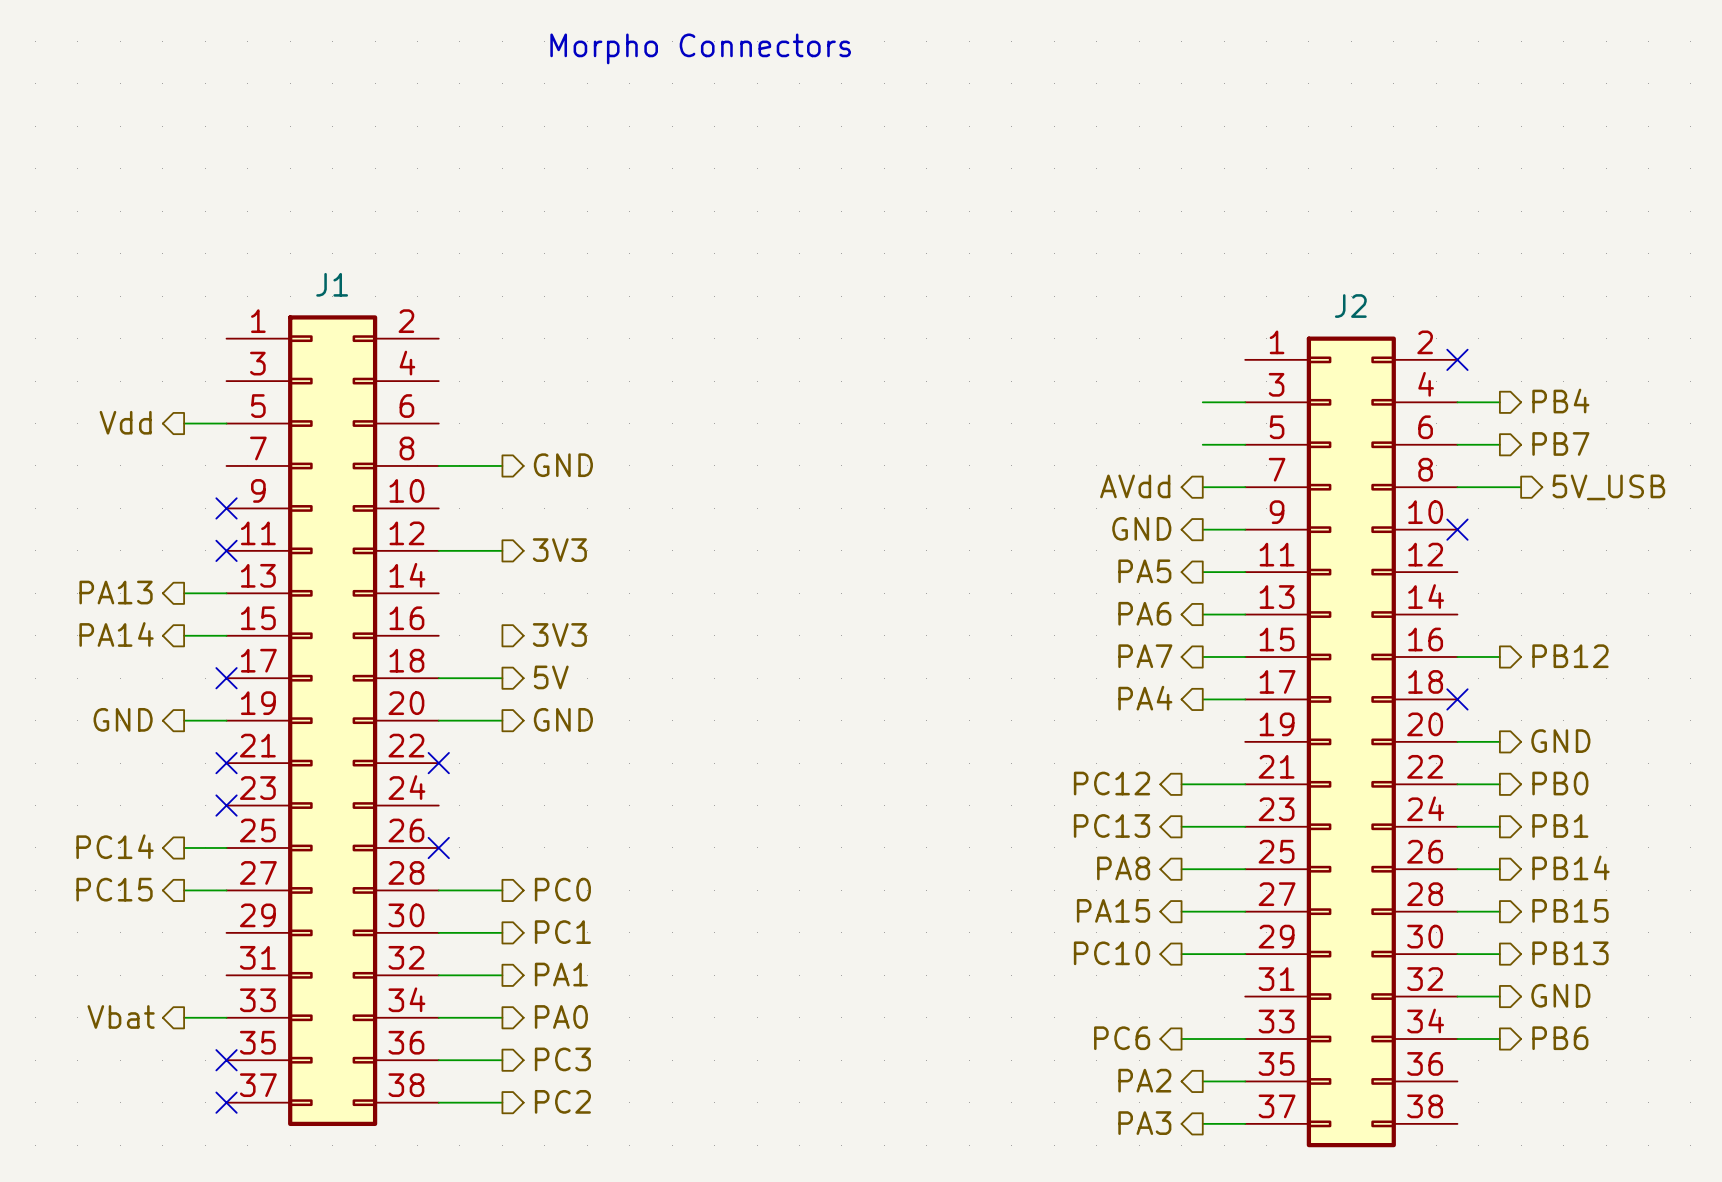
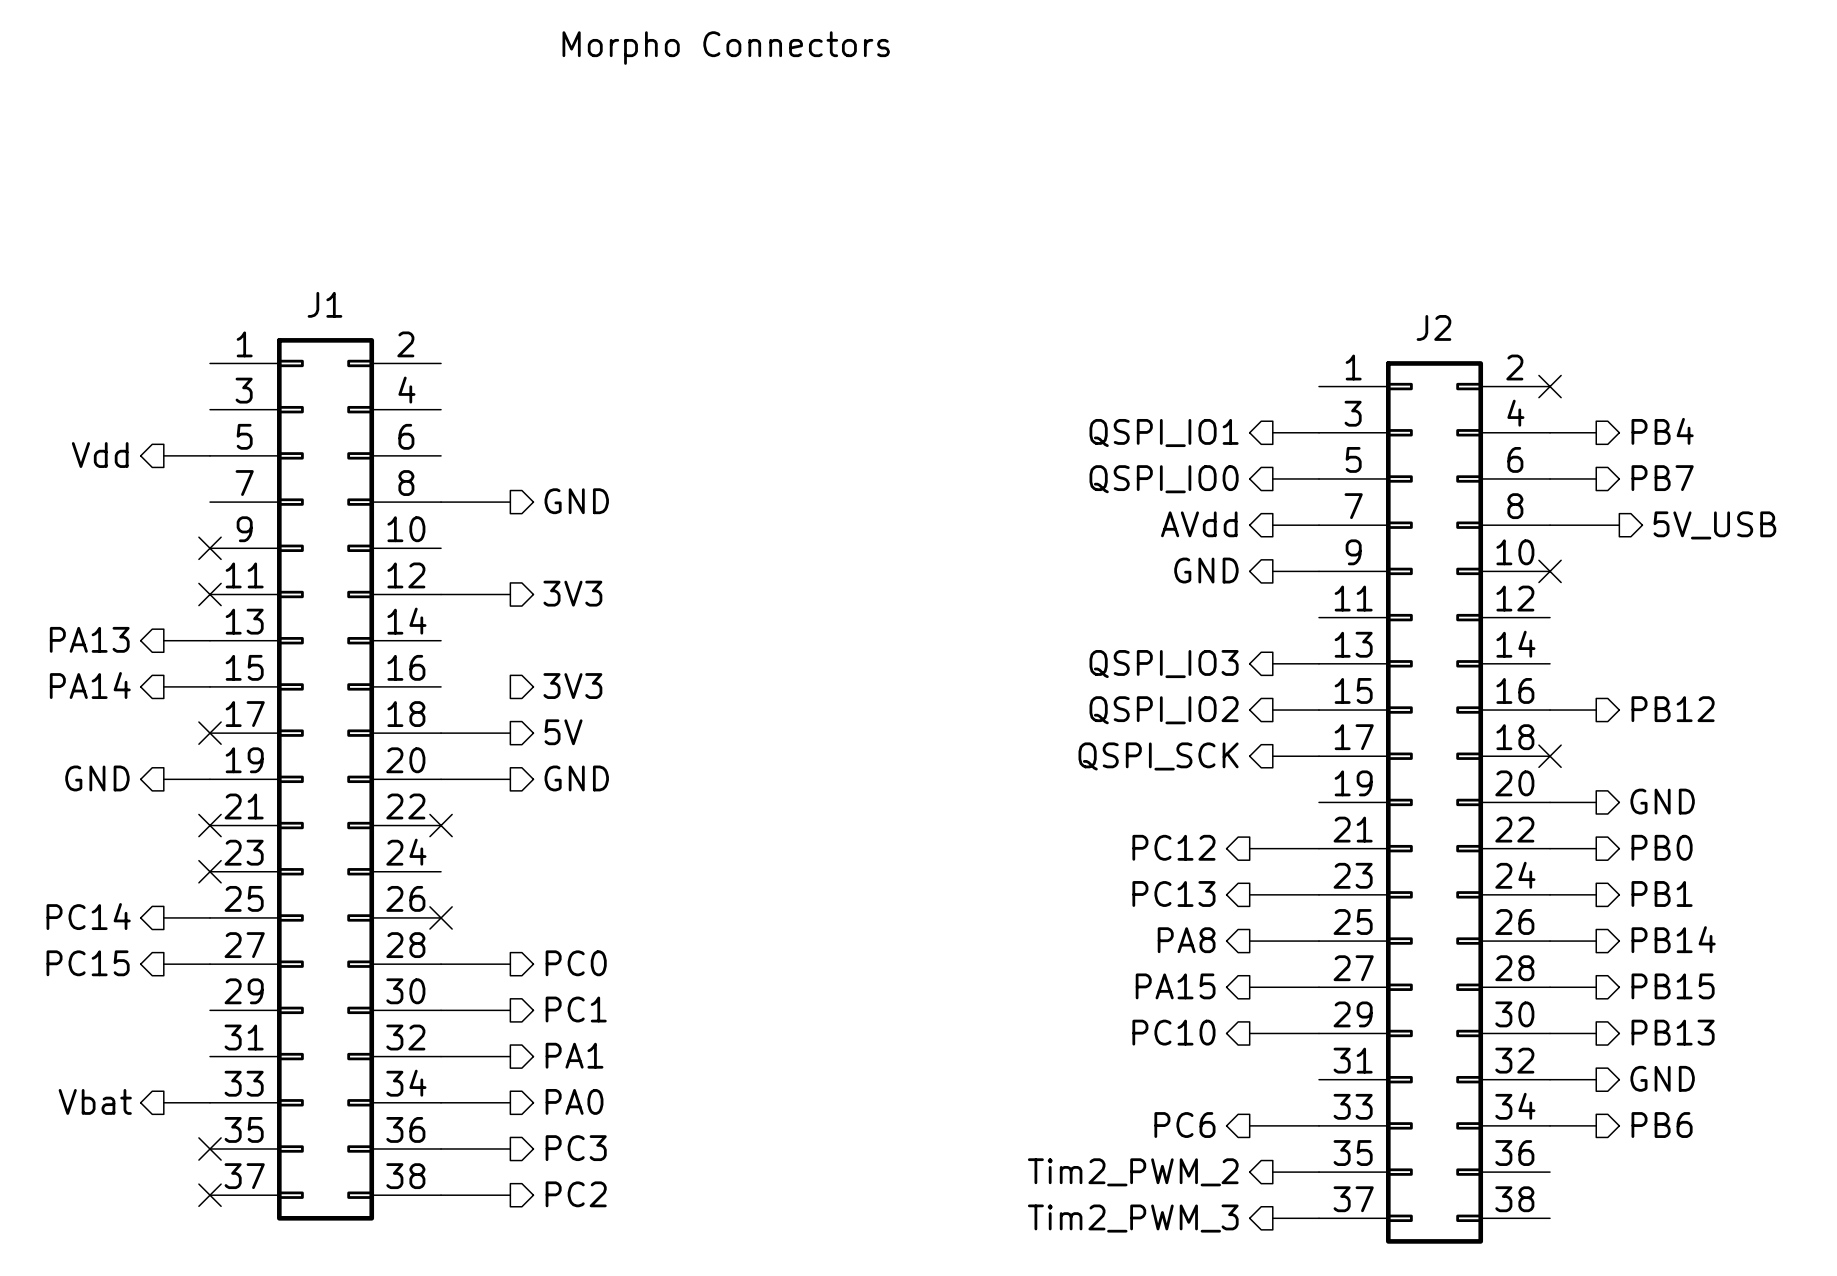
hierarchical label: none -> QSPI_IO1 (1164, 433)
hierarchical label: none -> QSPI_IO0 (1164, 479)
hierarchical label: PA5 (1144, 571) -> none
wire: (1202, 572) (1245, 572) -> none
hierarchical label: PA6 (1144, 613) -> QSPI_IO3 (1164, 664)
hierarchical label: PA7 (1145, 656) -> QSPI_IO2 (1164, 710)
hierarchical label: PA4 (1145, 698) -> QSPI_SCK (1158, 756)
hierarchical label: PA2 (1144, 1080) -> Tim2_PWM_2 (1133, 1172)
hierarchical label: PA3 (1144, 1123) -> Tim2_PWM_3 (1133, 1218)

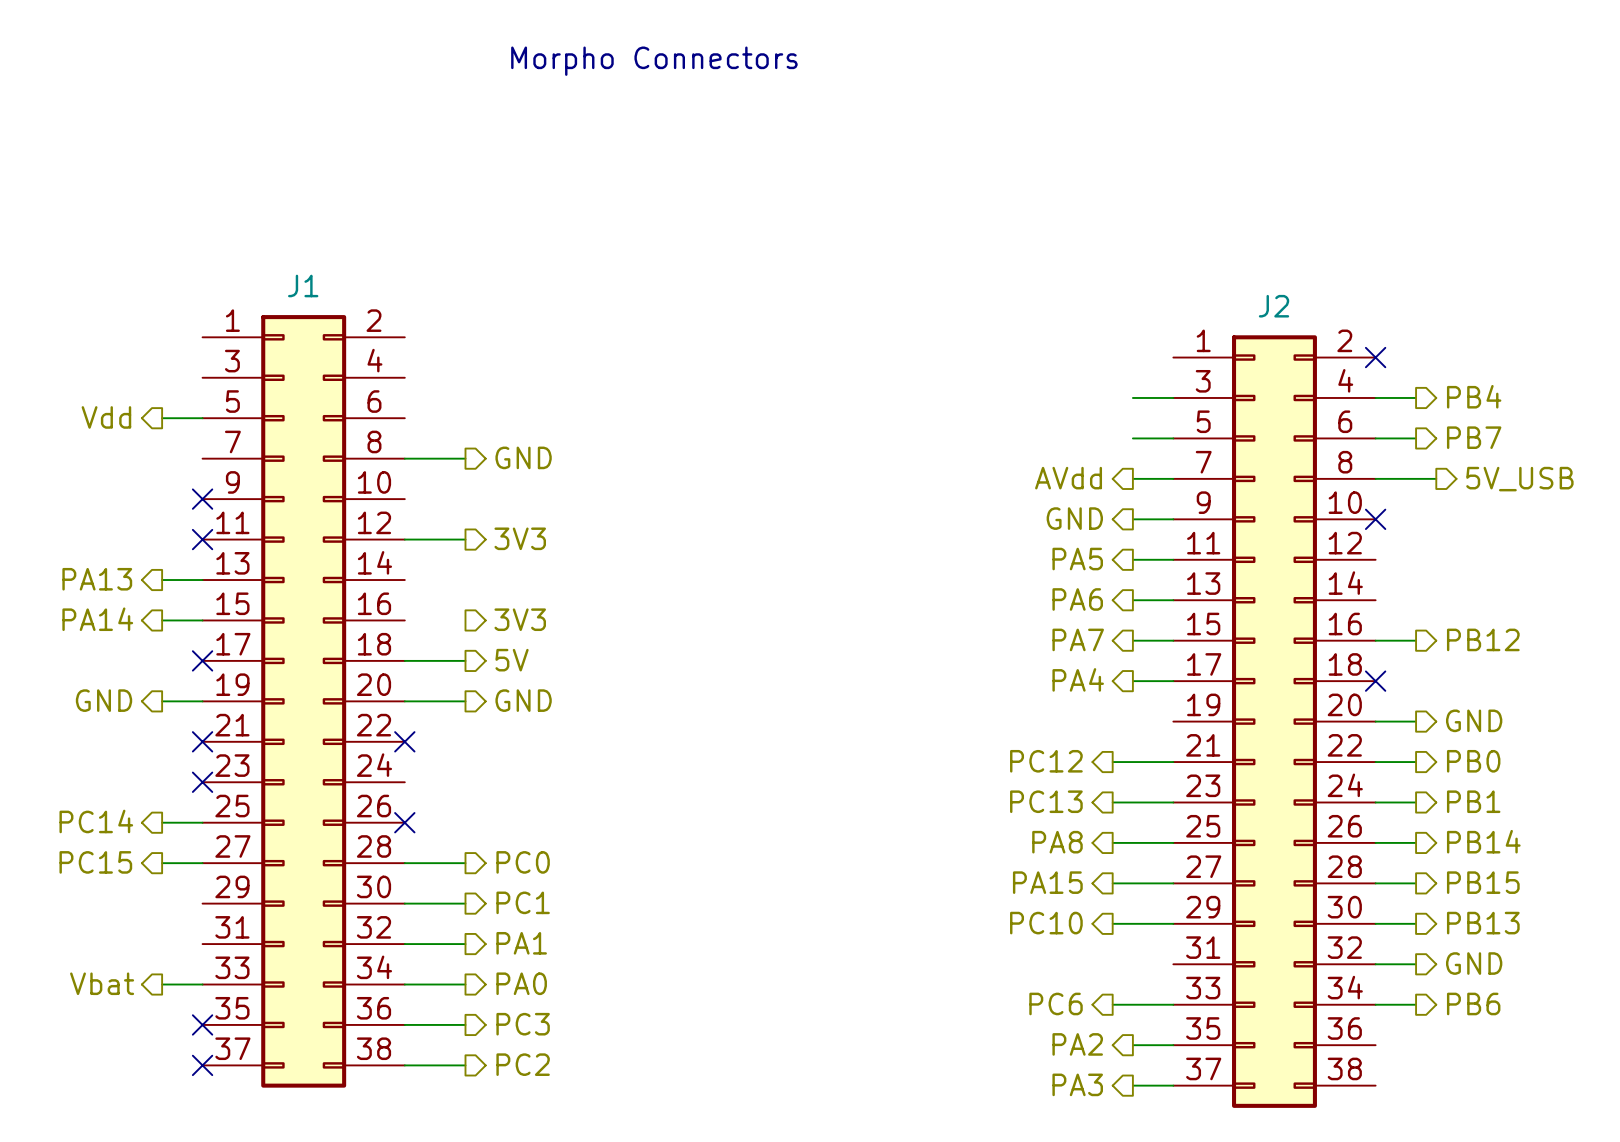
hierarchical label: QSPI_IO1 (1164, 433) -> none
hierarchical label: QSPI_IO0 (1164, 479) -> none
hierarchical label: none -> PA5 (1077, 559)
wire: none -> (1132, 559) (1173, 559)
hierarchical label: QSPI_IO3 (1164, 664) -> PA6 (1077, 599)
hierarchical label: QSPI_IO2 (1164, 710) -> PA7 (1078, 639)
hierarchical label: QSPI_SCK (1158, 756) -> PA4 (1078, 679)
hierarchical label: Tim2_PWM_2 (1133, 1172) -> PA2 (1077, 1044)
hierarchical label: Tim2_PWM_3 (1133, 1218) -> PA3 (1077, 1084)

